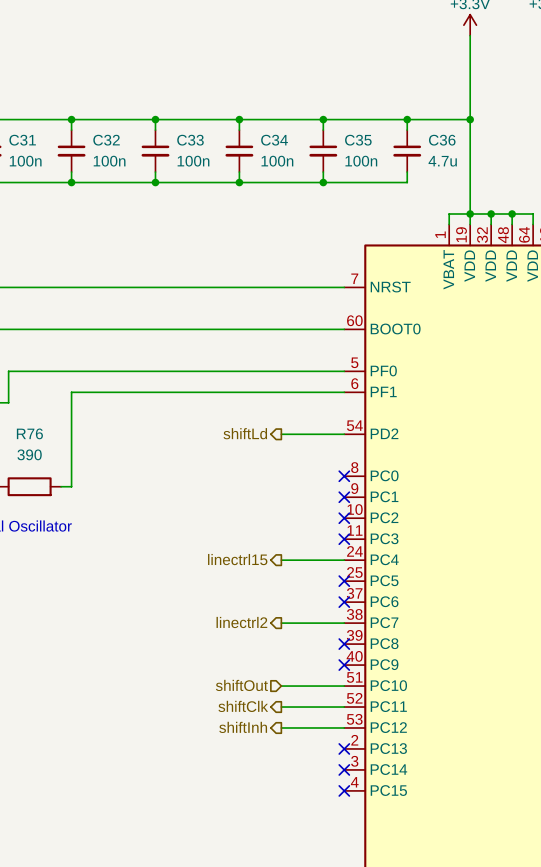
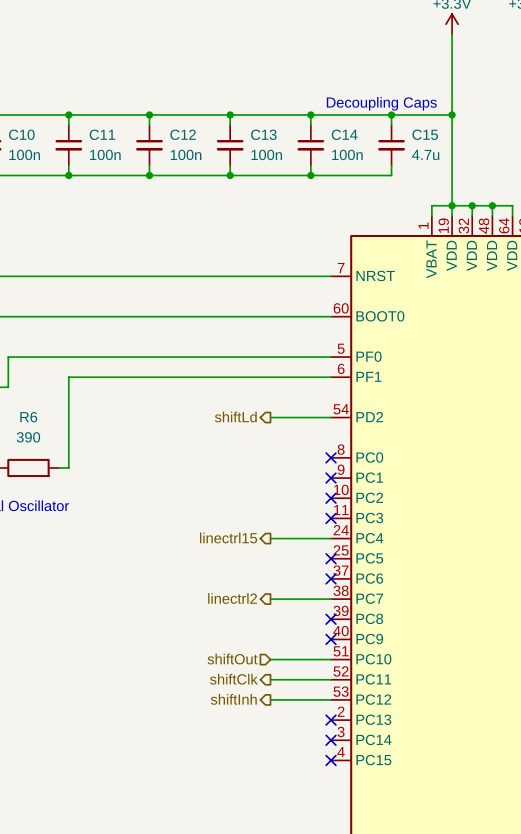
text: none -> Decoupling Caps (381, 103)
C31 name: C31 (22, 140) -> C10 (21, 134)
C32 name: C32 (106, 140) -> C11 (102, 134)
C33 name: C33 (190, 140) -> C12 (183, 134)
C34 name: C34 (274, 140) -> C13 (263, 134)
C35 name: C35 (358, 140) -> C14 (344, 134)
C36 name: C36 (442, 140) -> C15 (425, 134)
R76 name: R76 (29, 433) -> R6 (28, 417)

